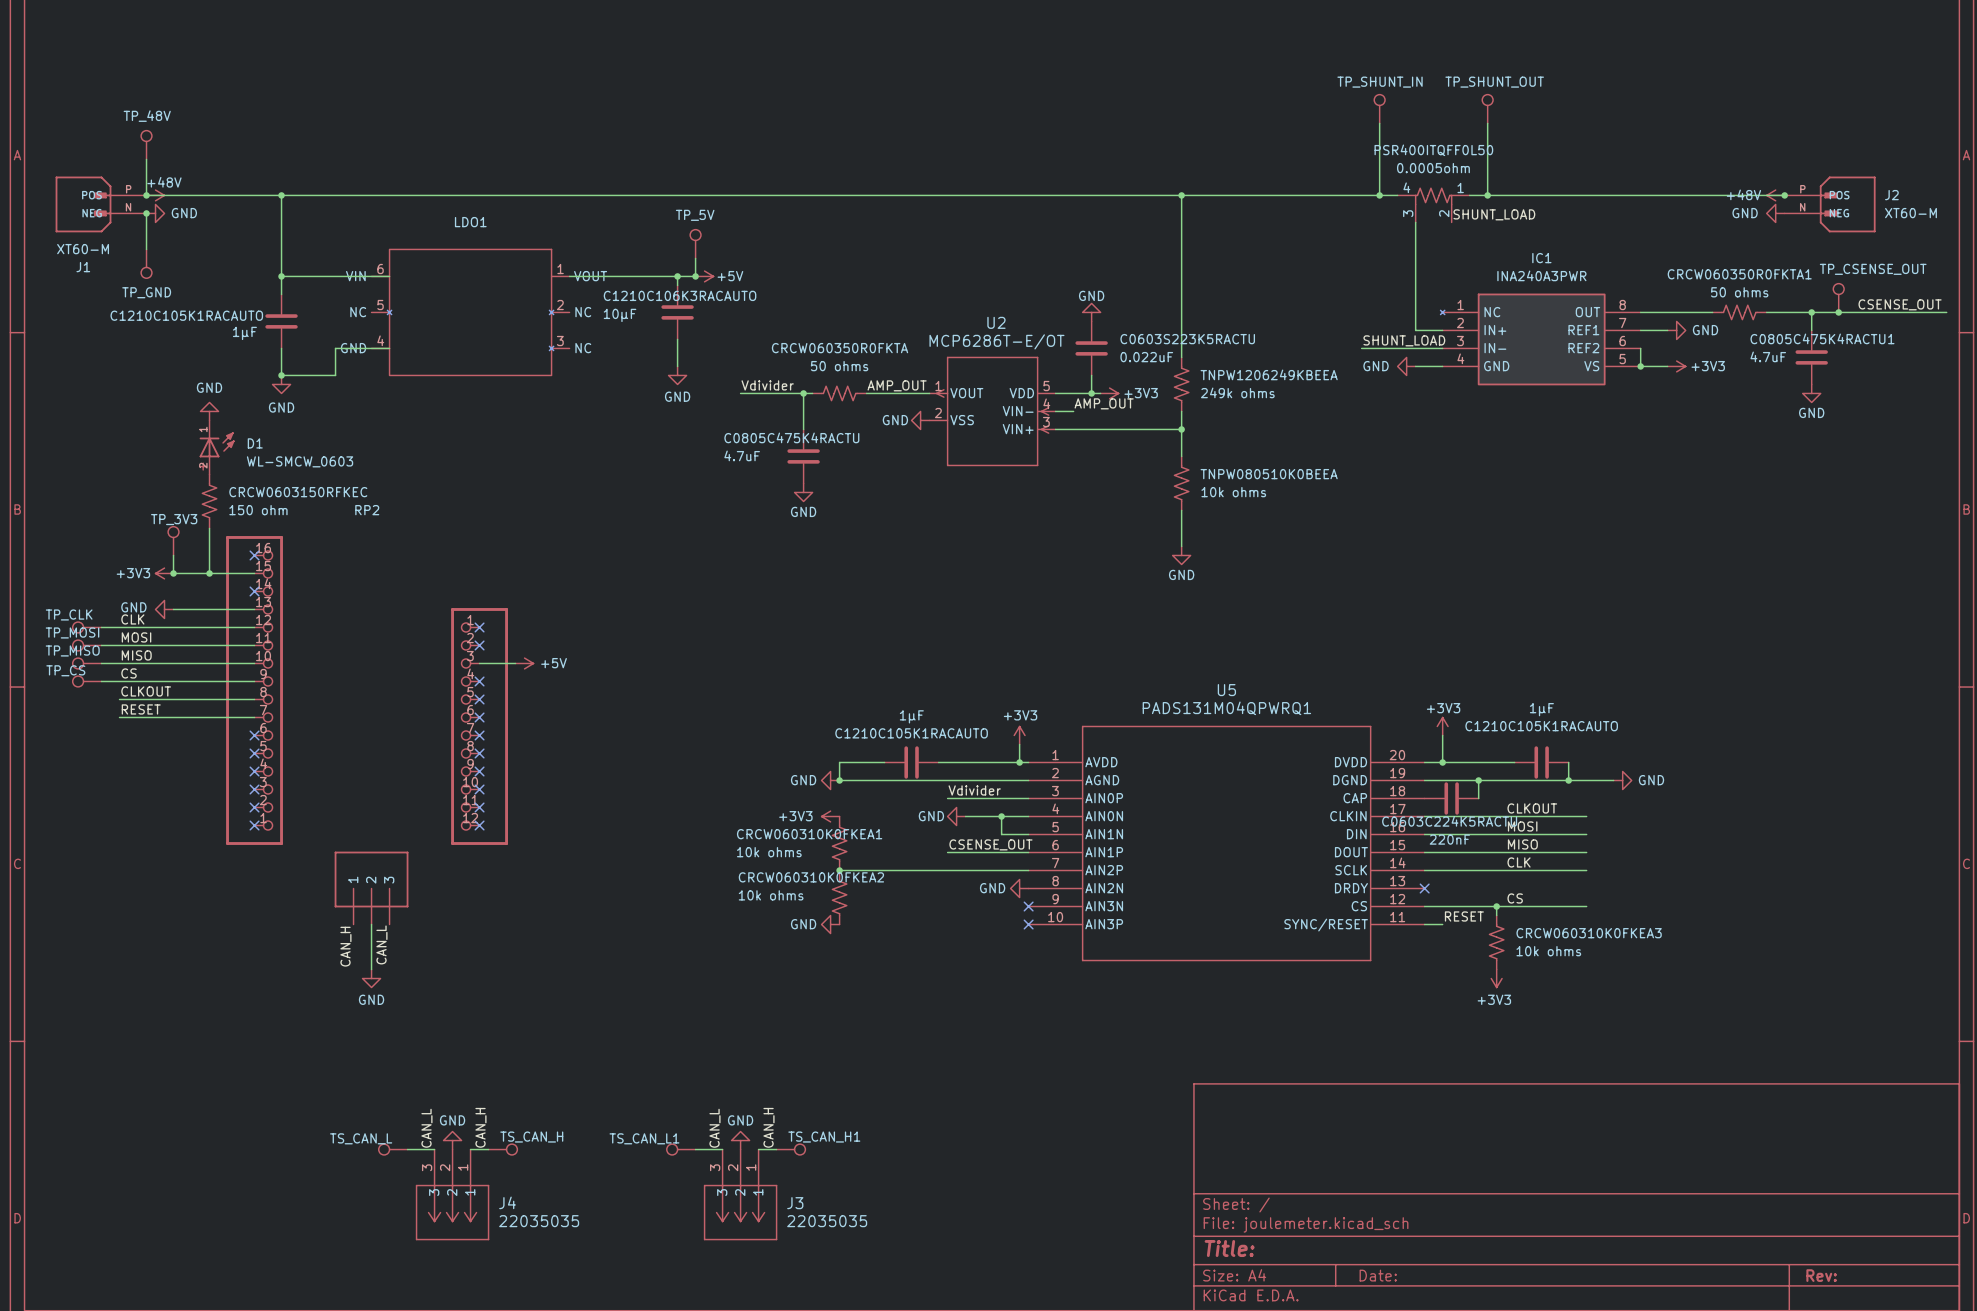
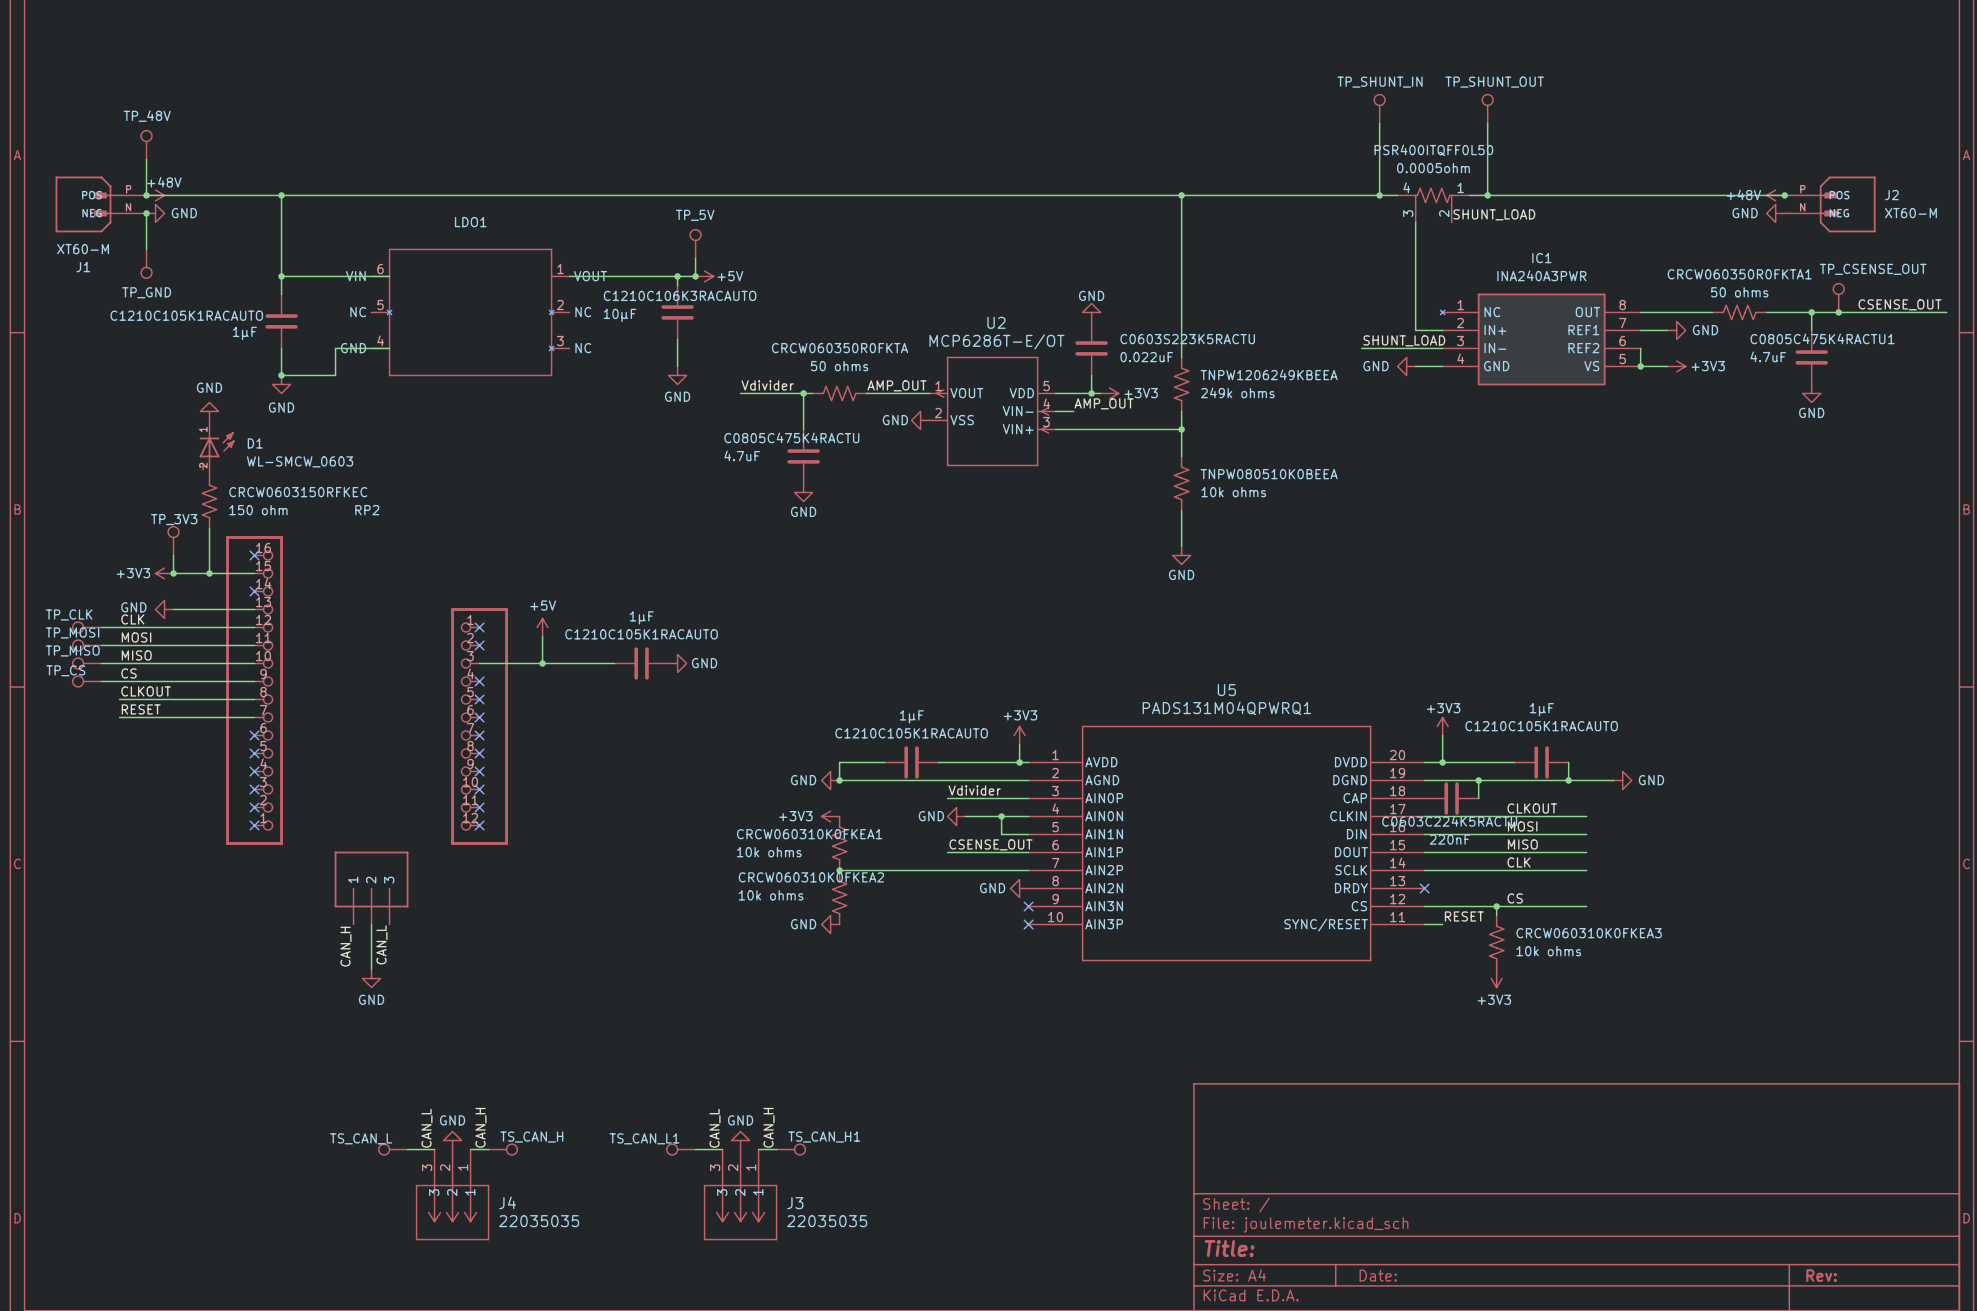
wire: none -> (542, 636) (542, 663)
wire: none -> (515, 663) (614, 663)
power symbol rotation: 0° (524, 663) -> 90° counterclockwise (542, 627)
power symbol position: +5V (524, 663) -> +5V (542, 627)
junction: none -> (542, 663)
C1210C105K1RACAUTO: none -> 1μF (641, 663)
power symbol: none -> GND (677, 663)

